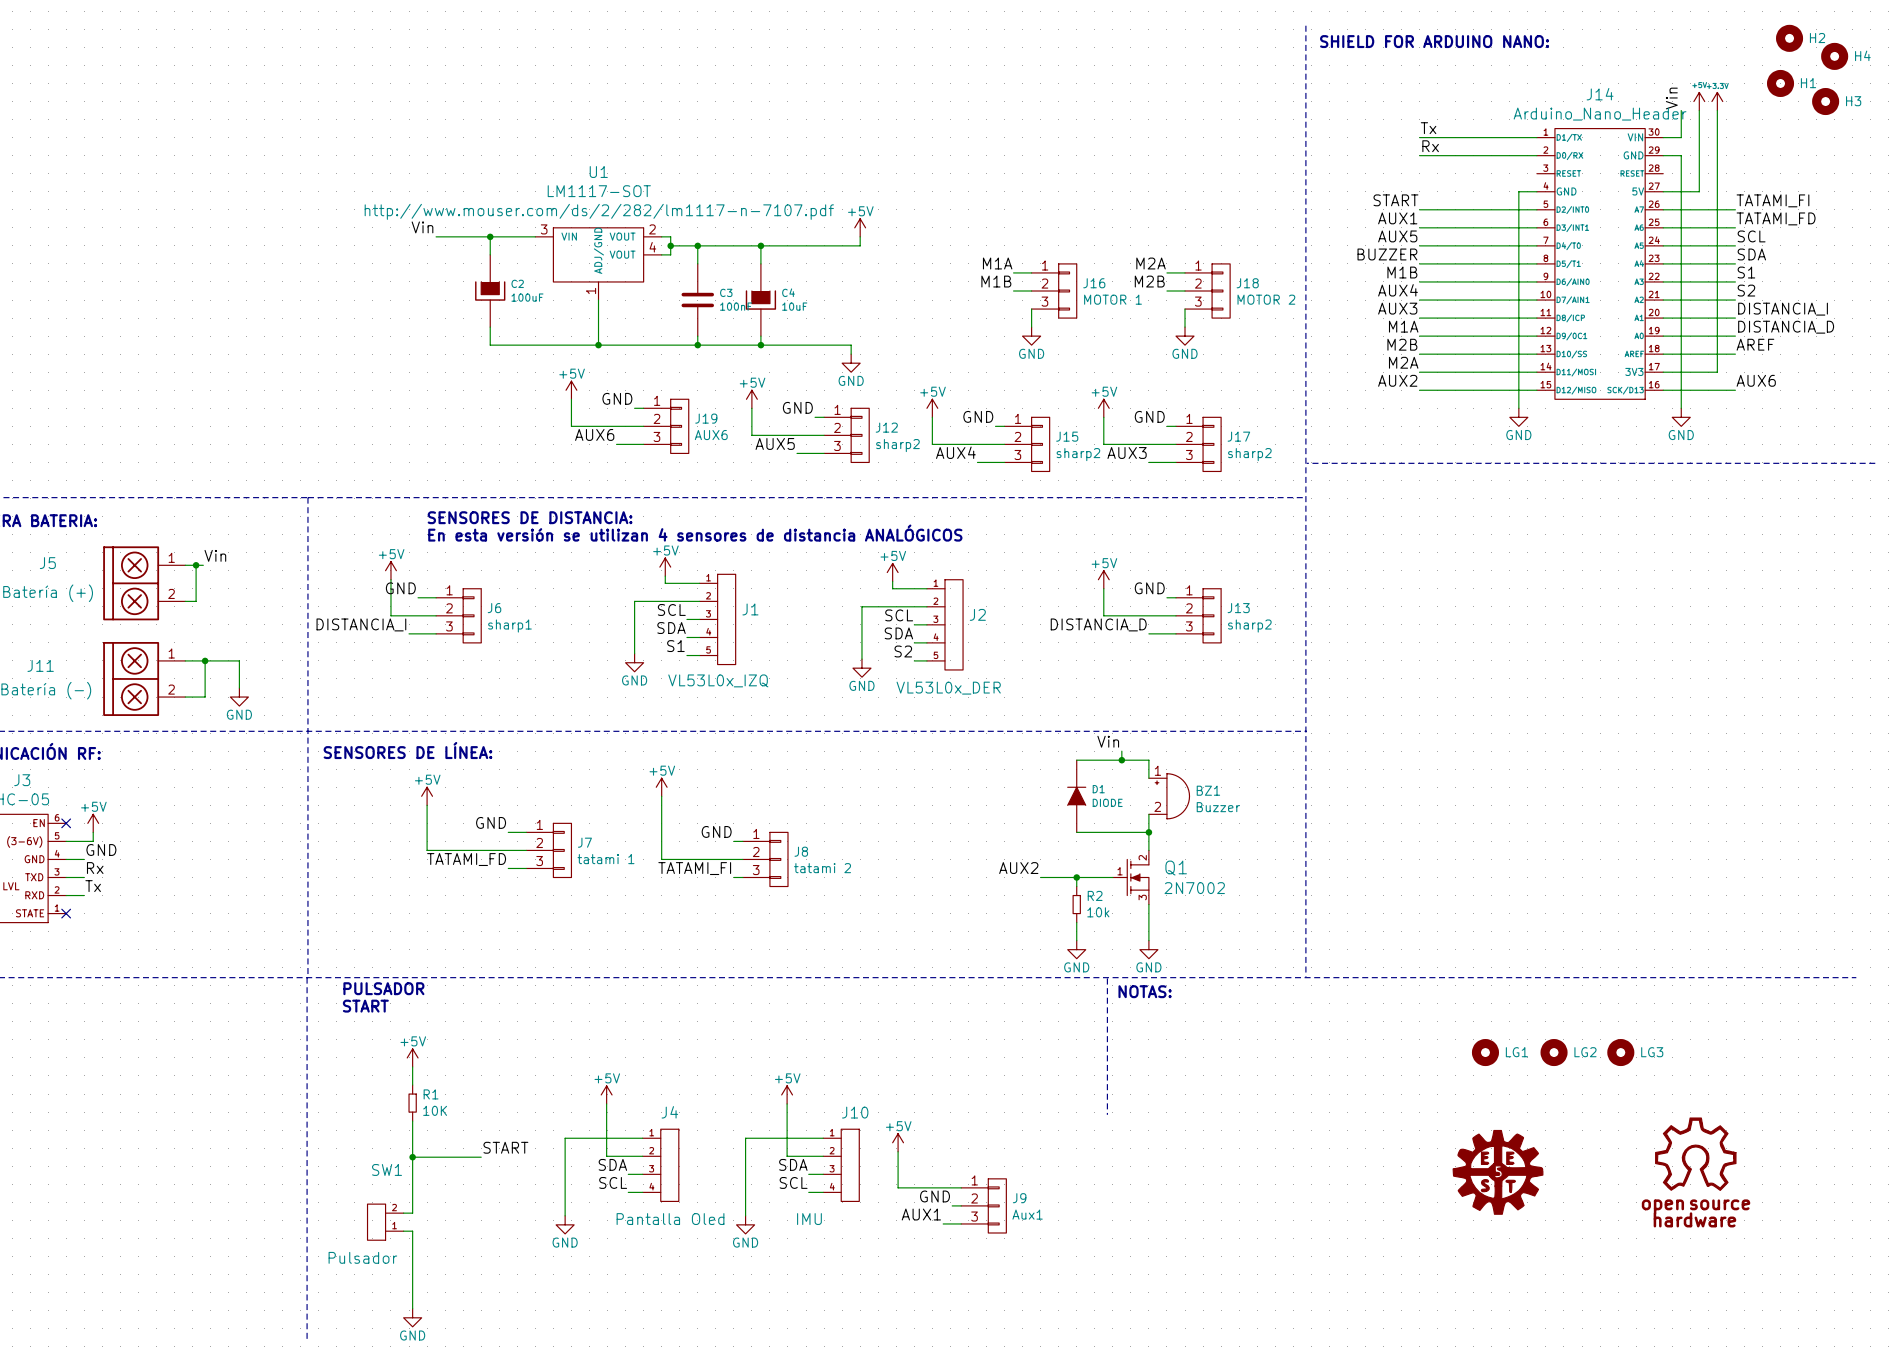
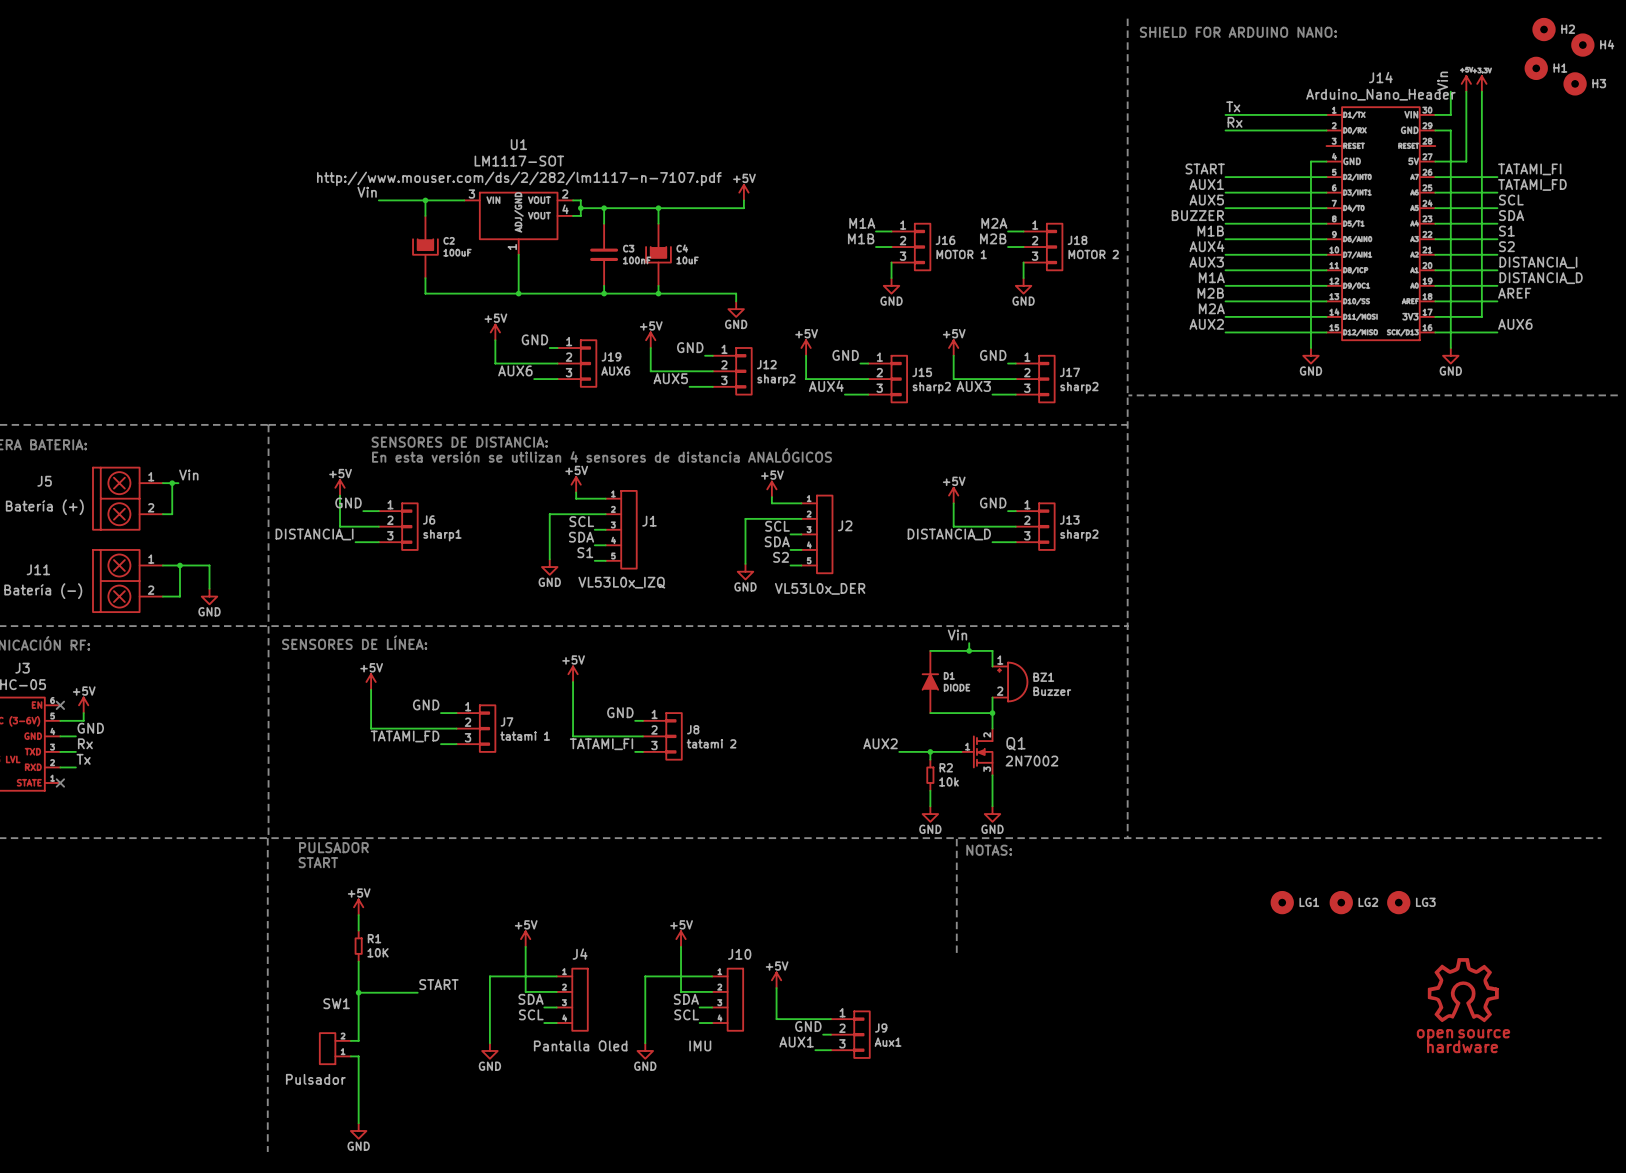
power symbol: (1498, 1172) -> none

